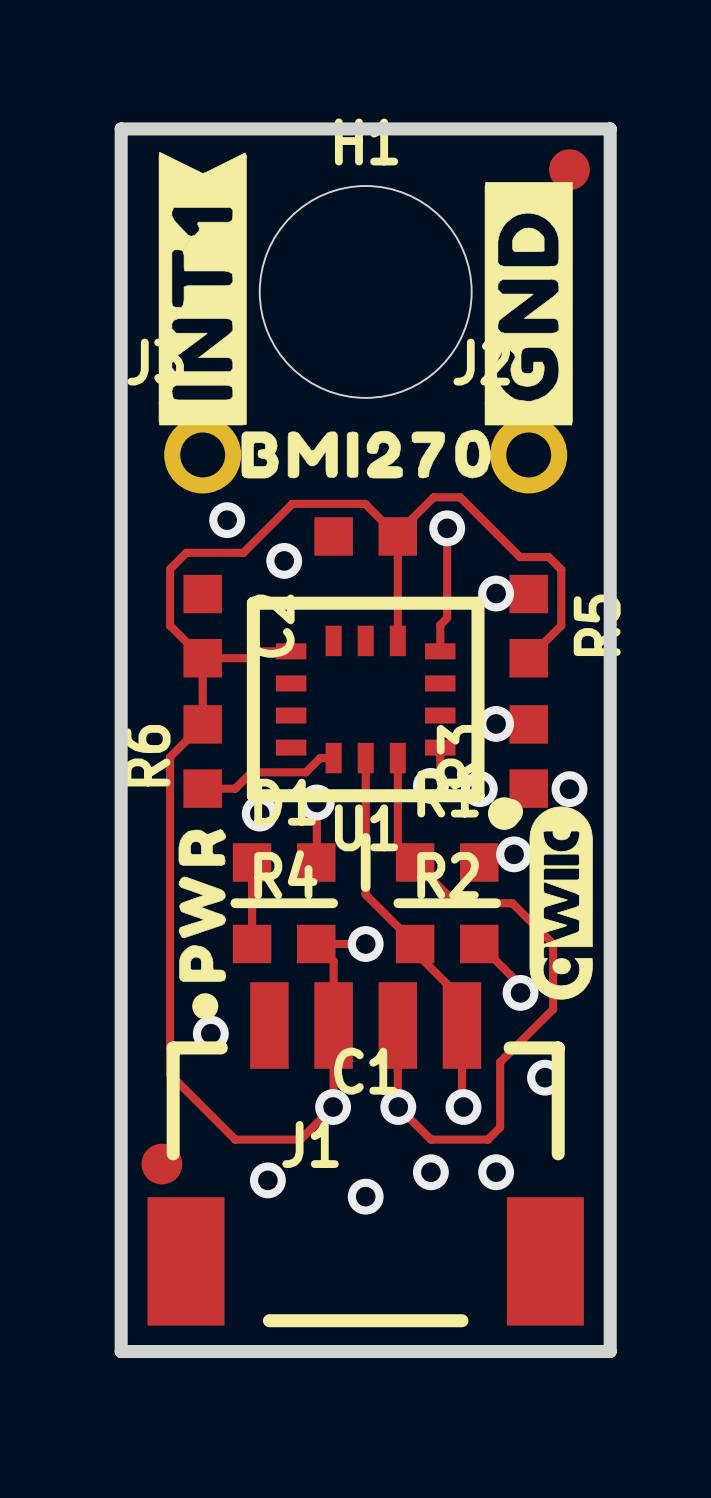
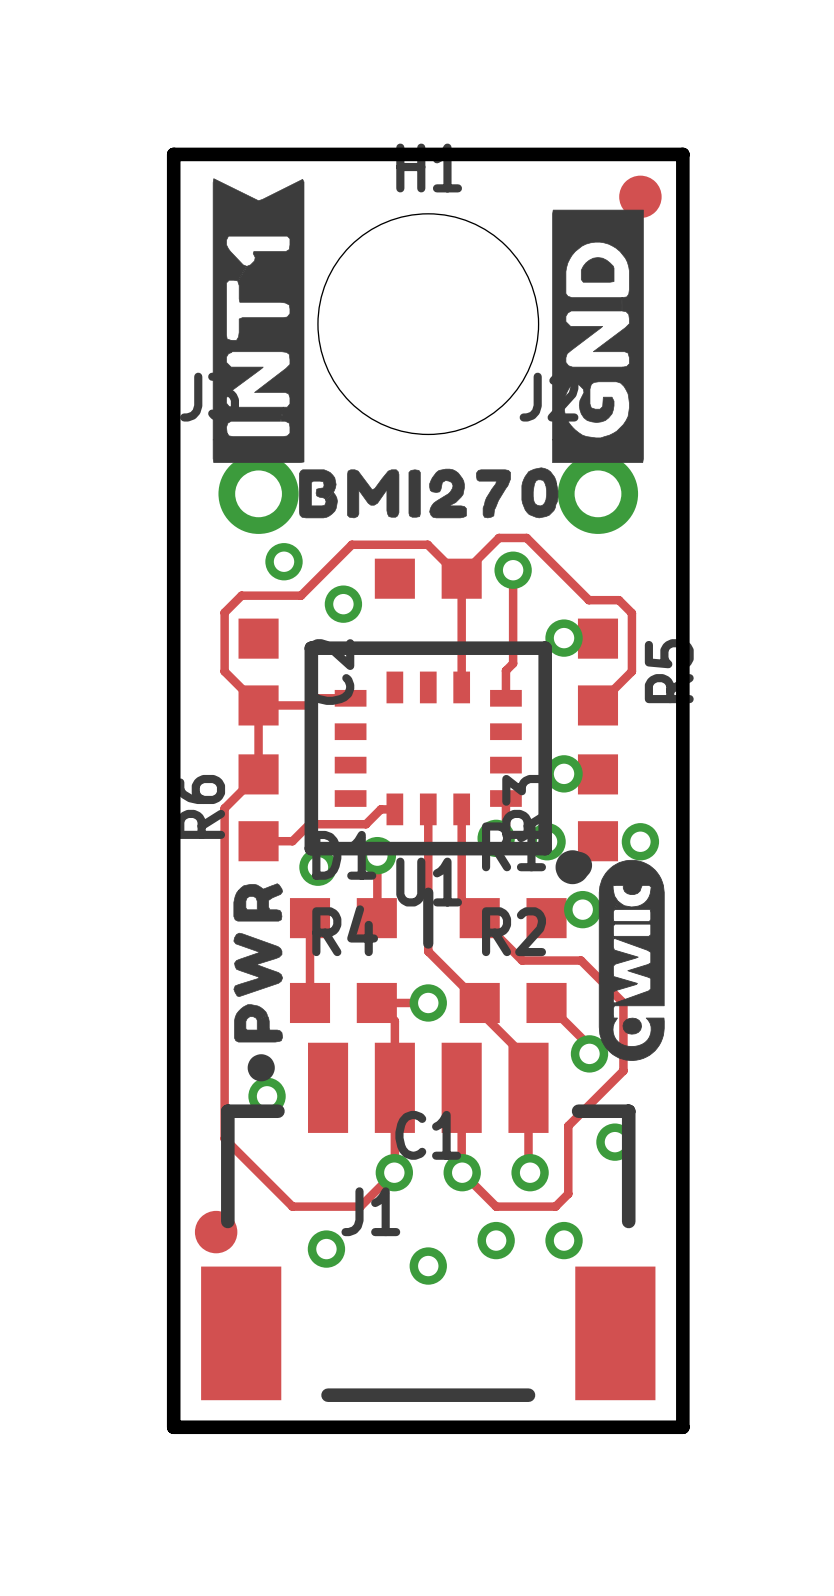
line: (235, 903) (333, 903) -> none
line: (398, 903) (496, 903) -> none

